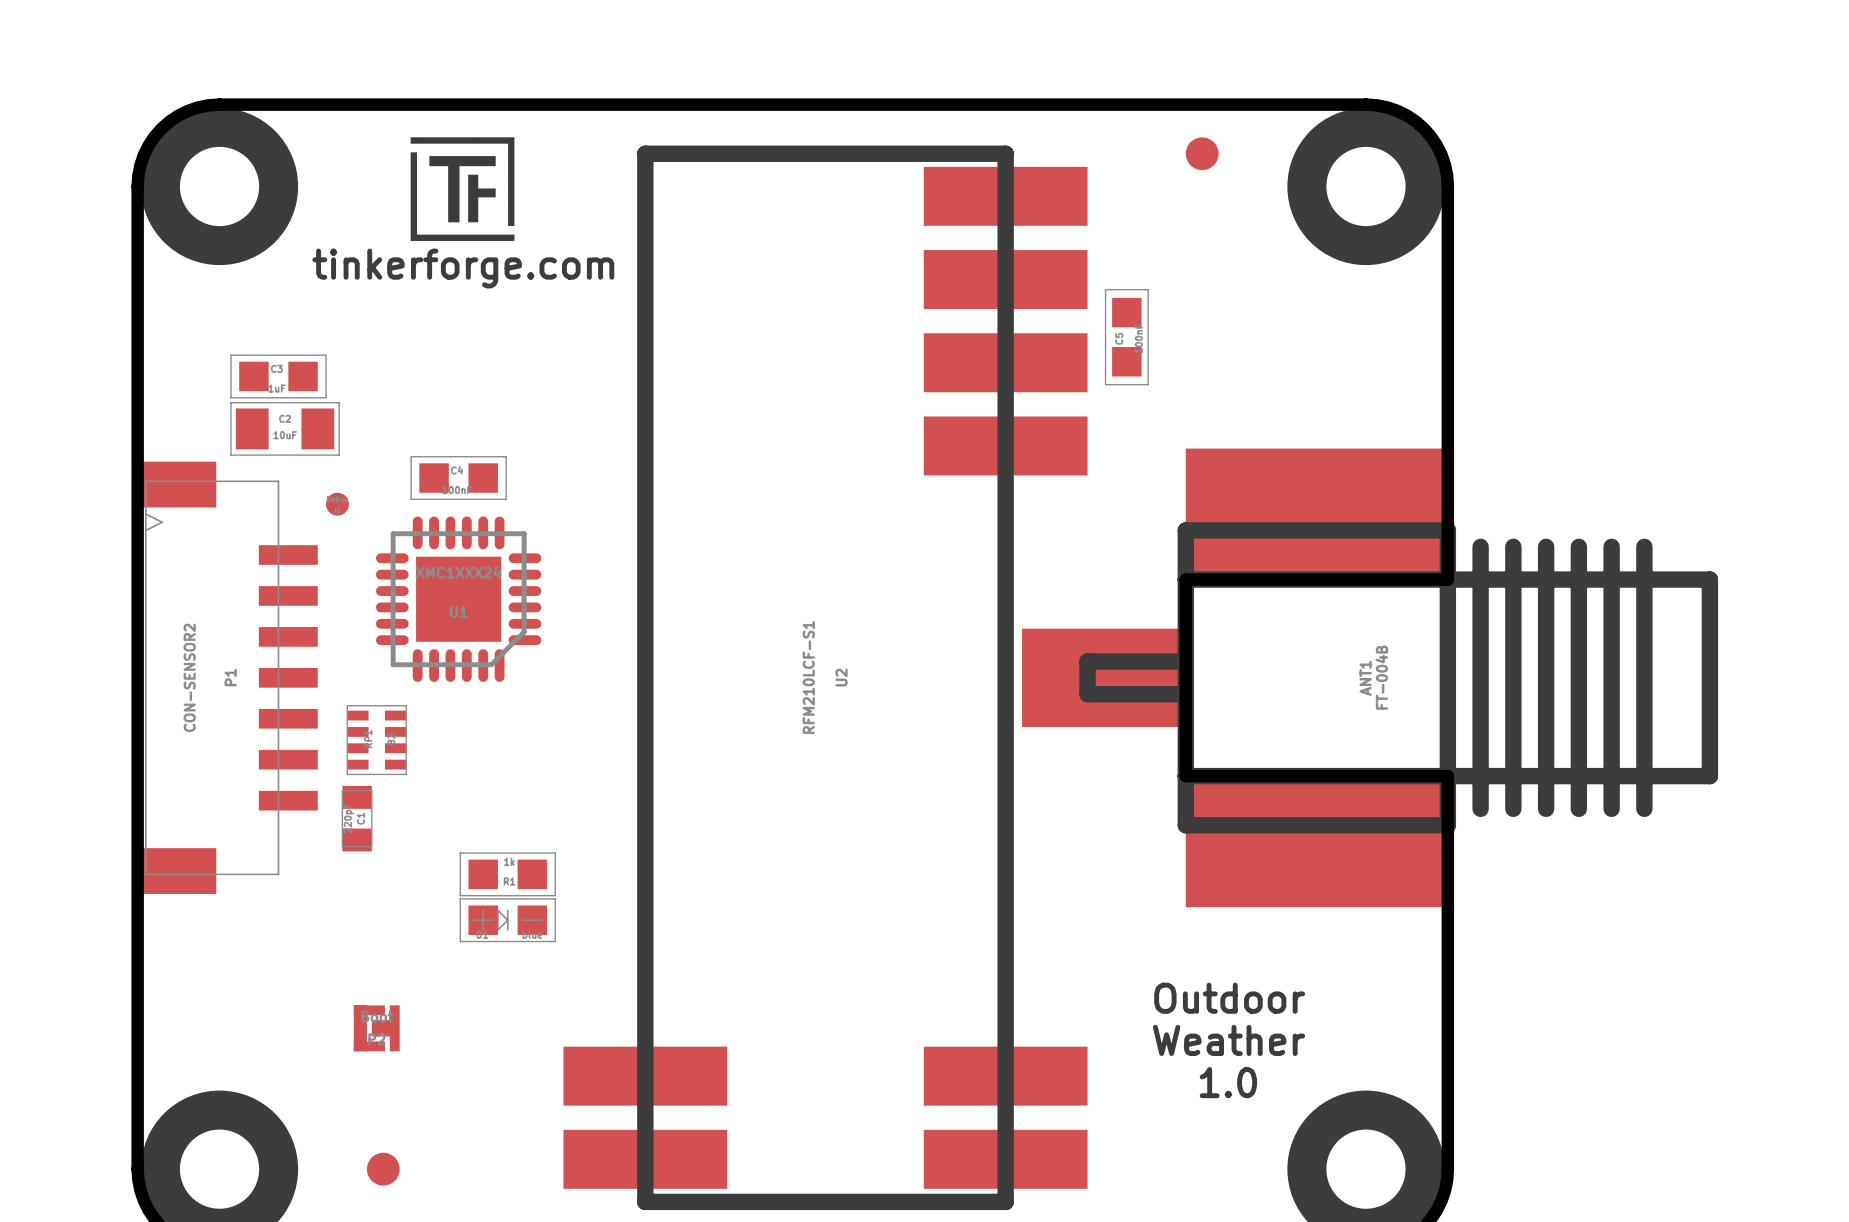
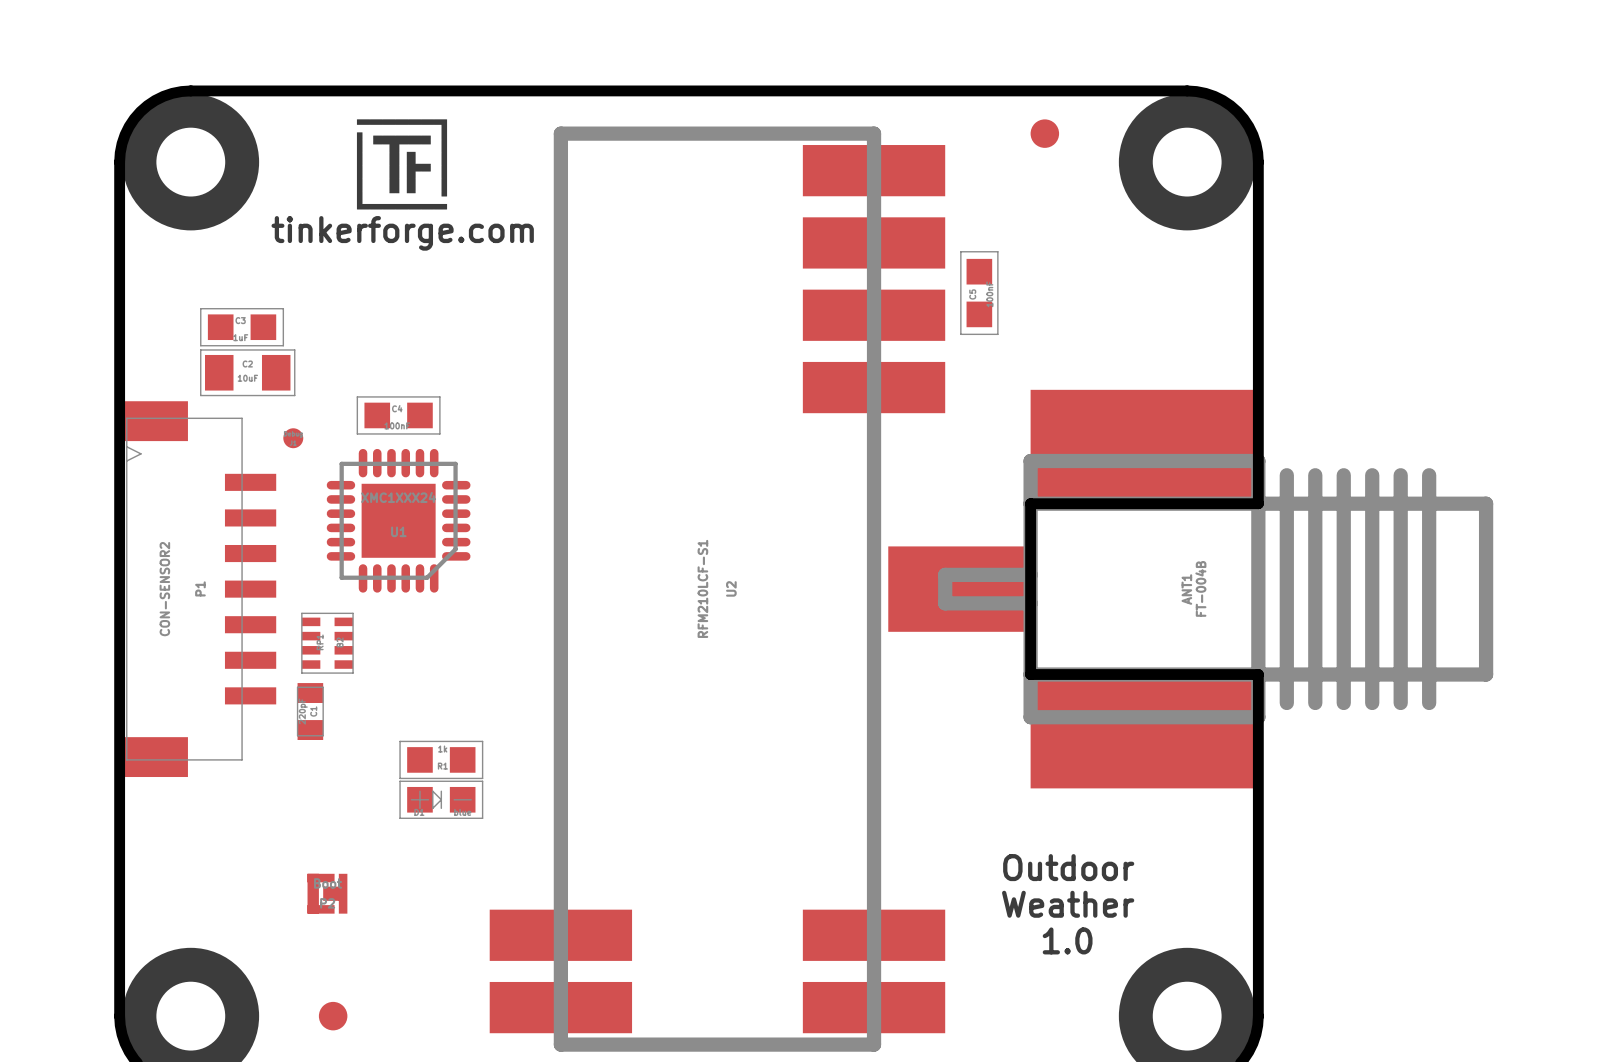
U2 footprint: [563, 145, 1088, 1211] -> [489, 126, 946, 1052]
ANT1 footprint: [1022, 448, 1719, 908] -> [888, 389, 1494, 789]

